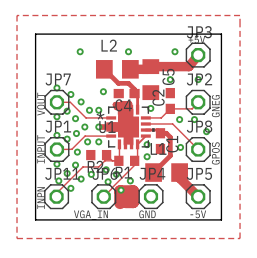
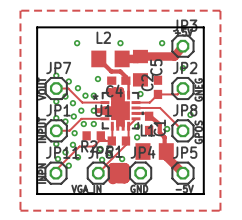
via: (170, 79) -> none
via: (179, 119) -> none
via: (194, 119) -> none
track: (158, 130) (160, 133) (166, 133) (170, 137) (170, 155) (153, 172) -> (147, 113) (159, 124) (159, 132) (164, 137) (164, 151)
via: (91, 174) -> none
via: (121, 190) -> none

